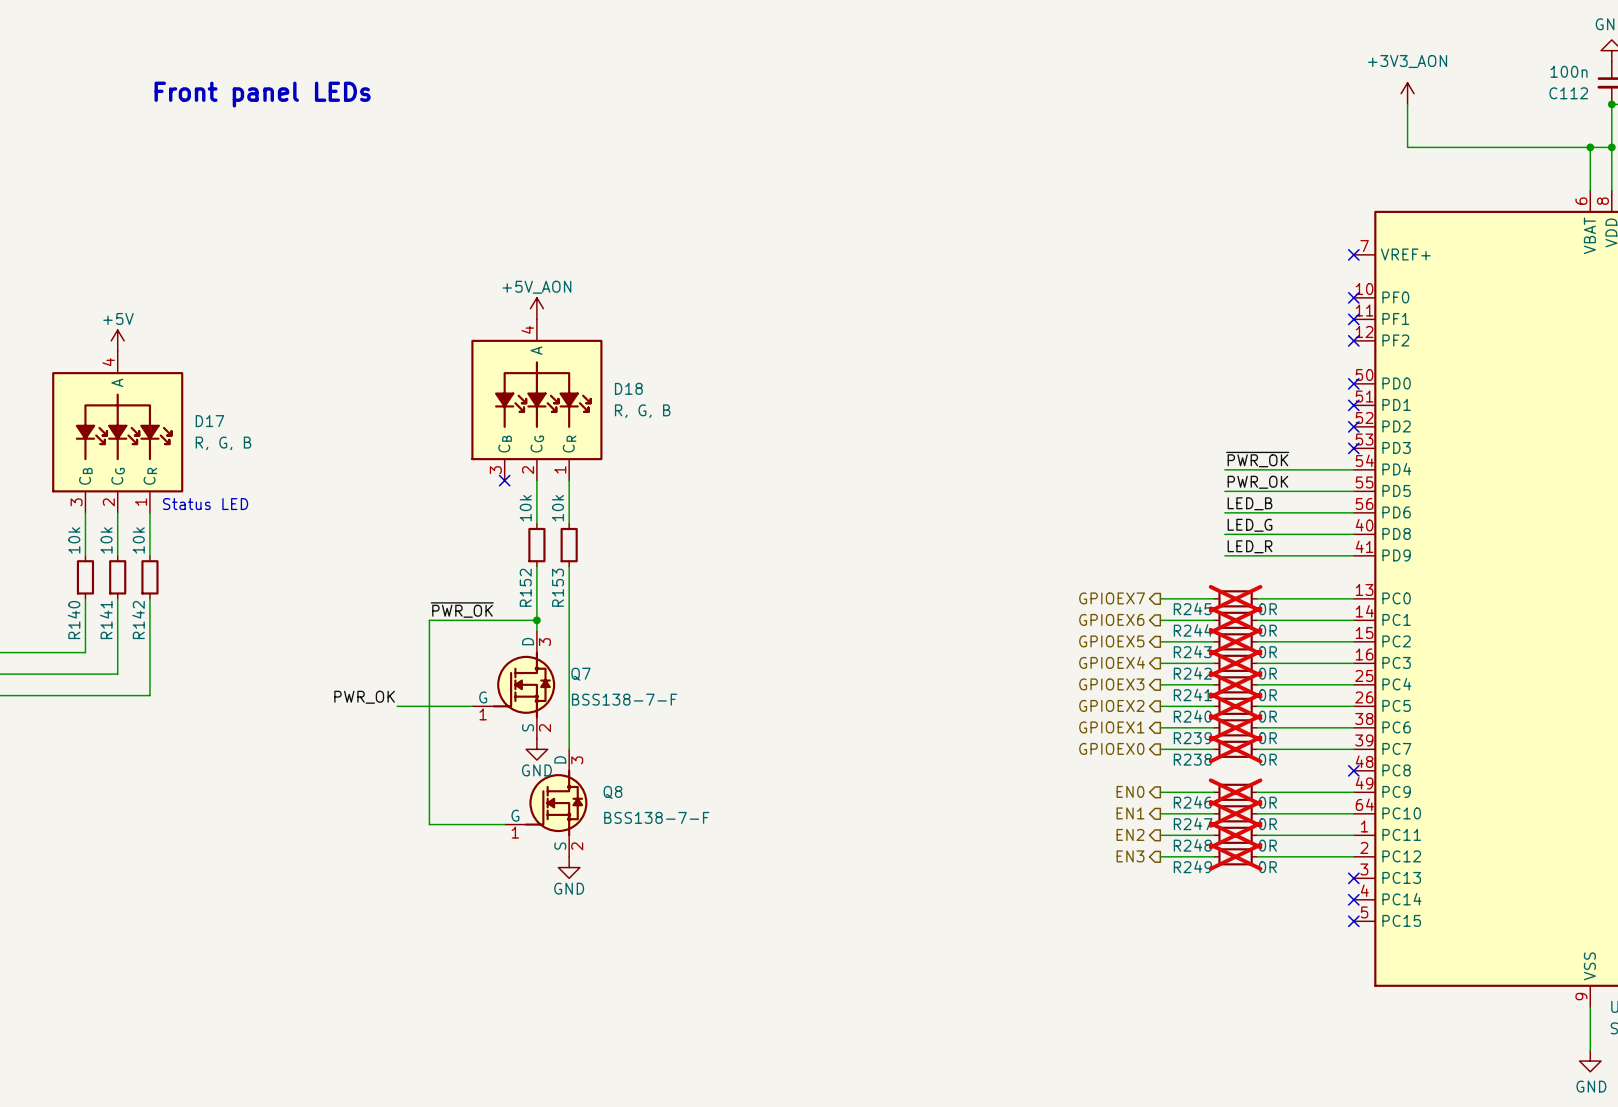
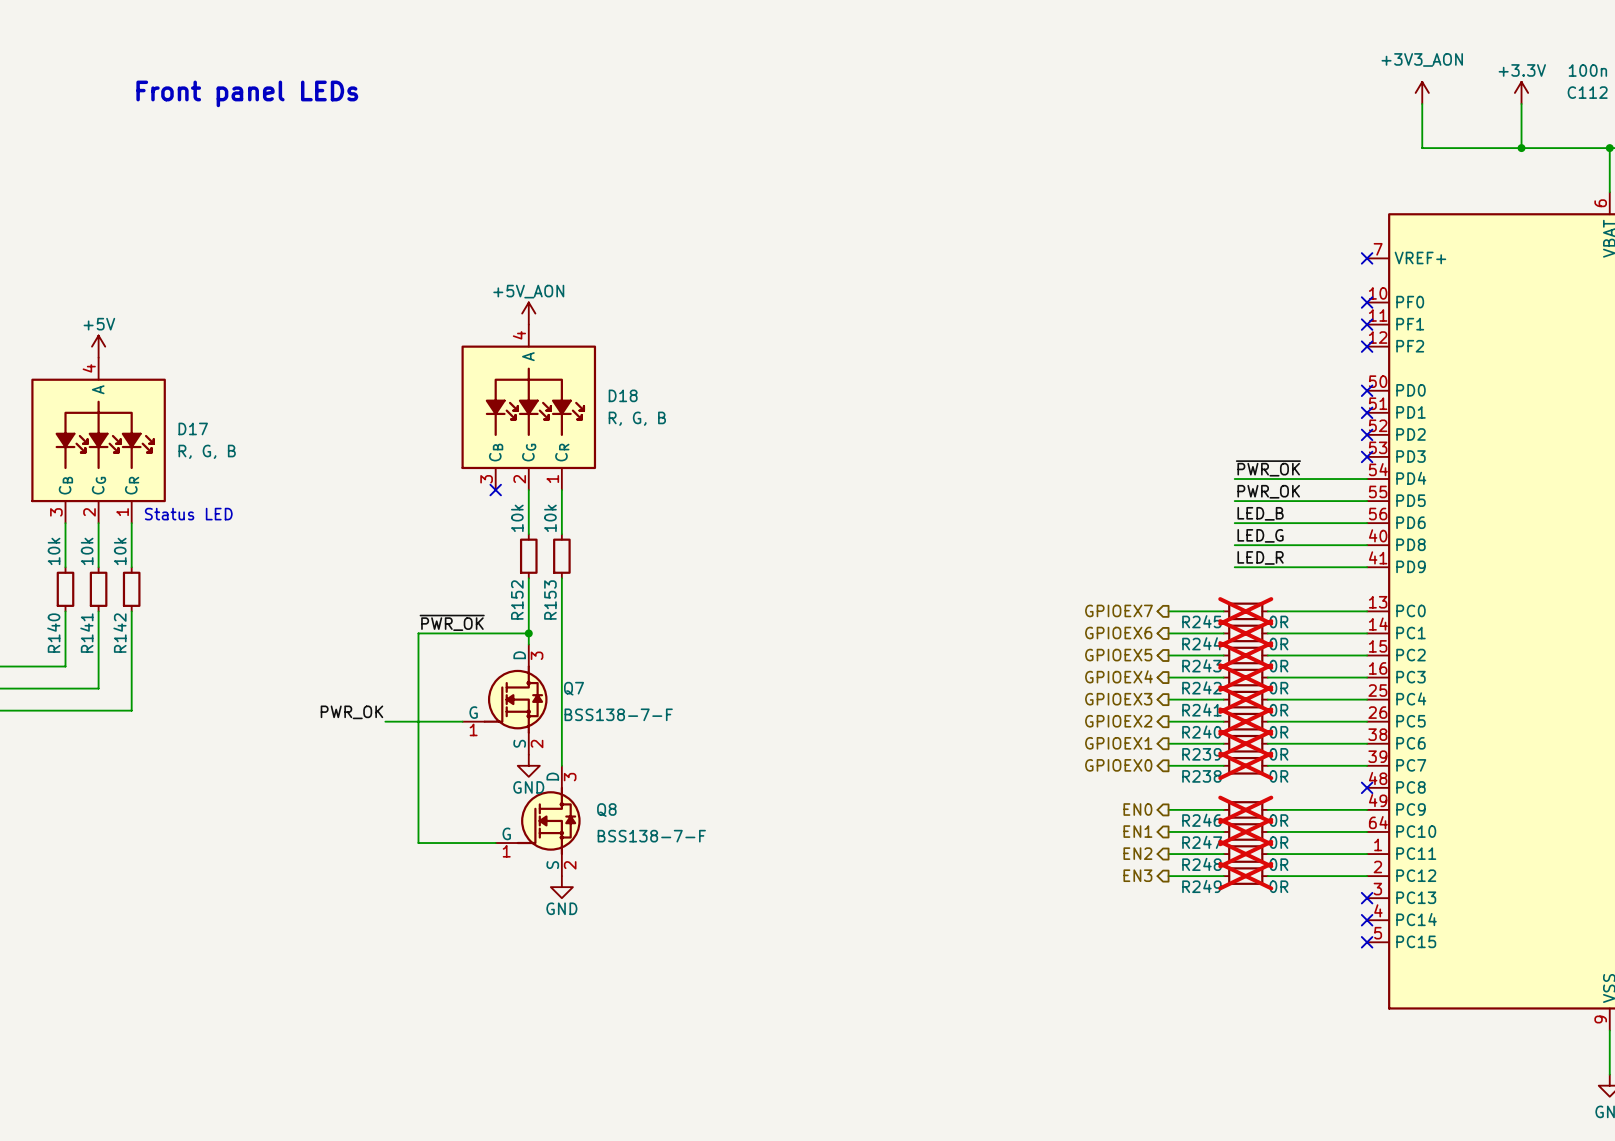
power symbol: none -> +3.3V (1521, 92)
wire: none -> (1521, 103) (1521, 148)
junction: none -> (1521, 148)

